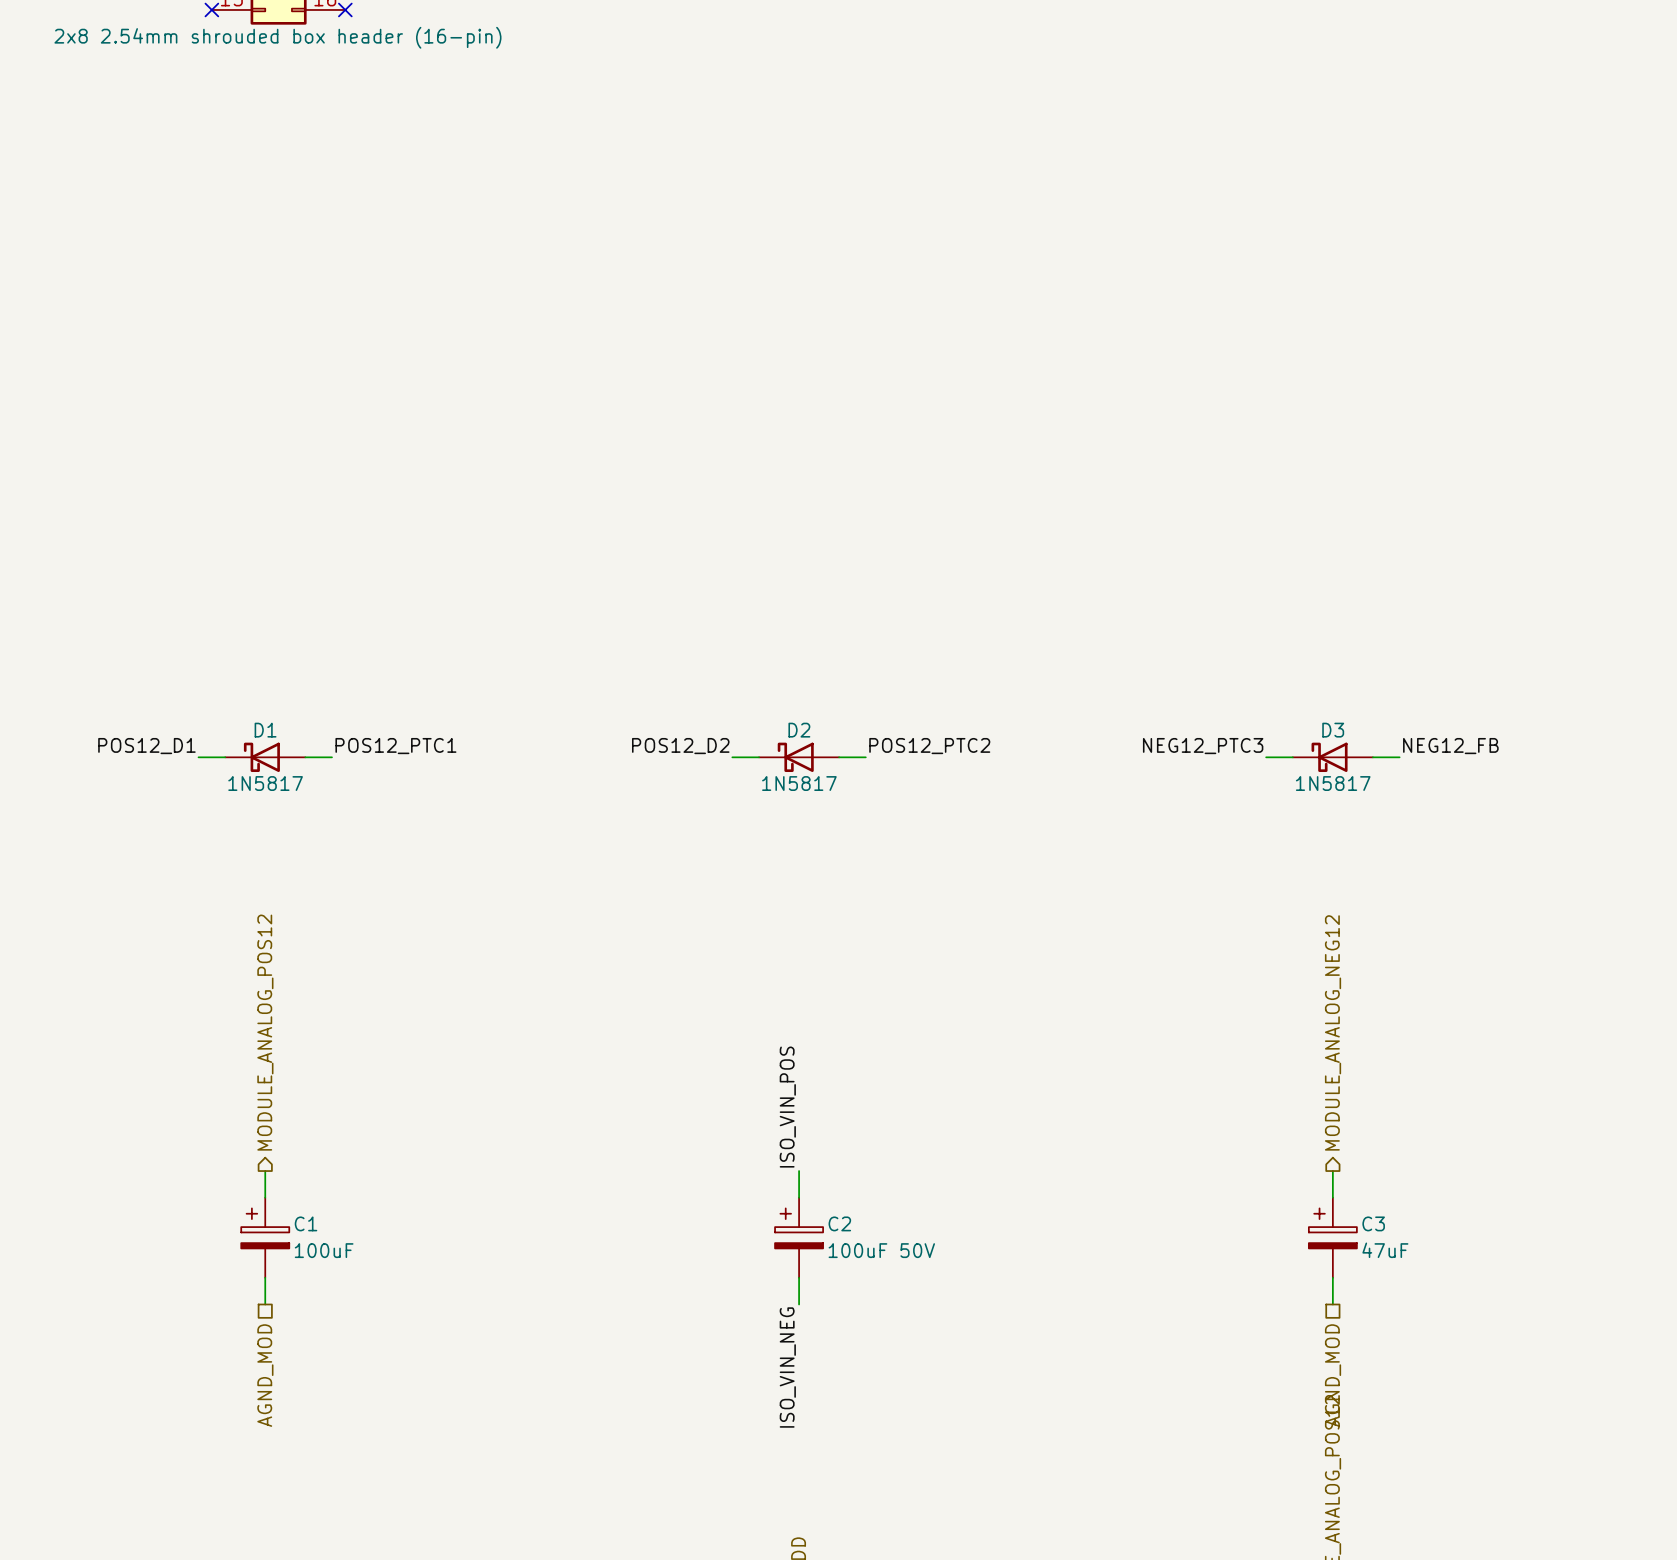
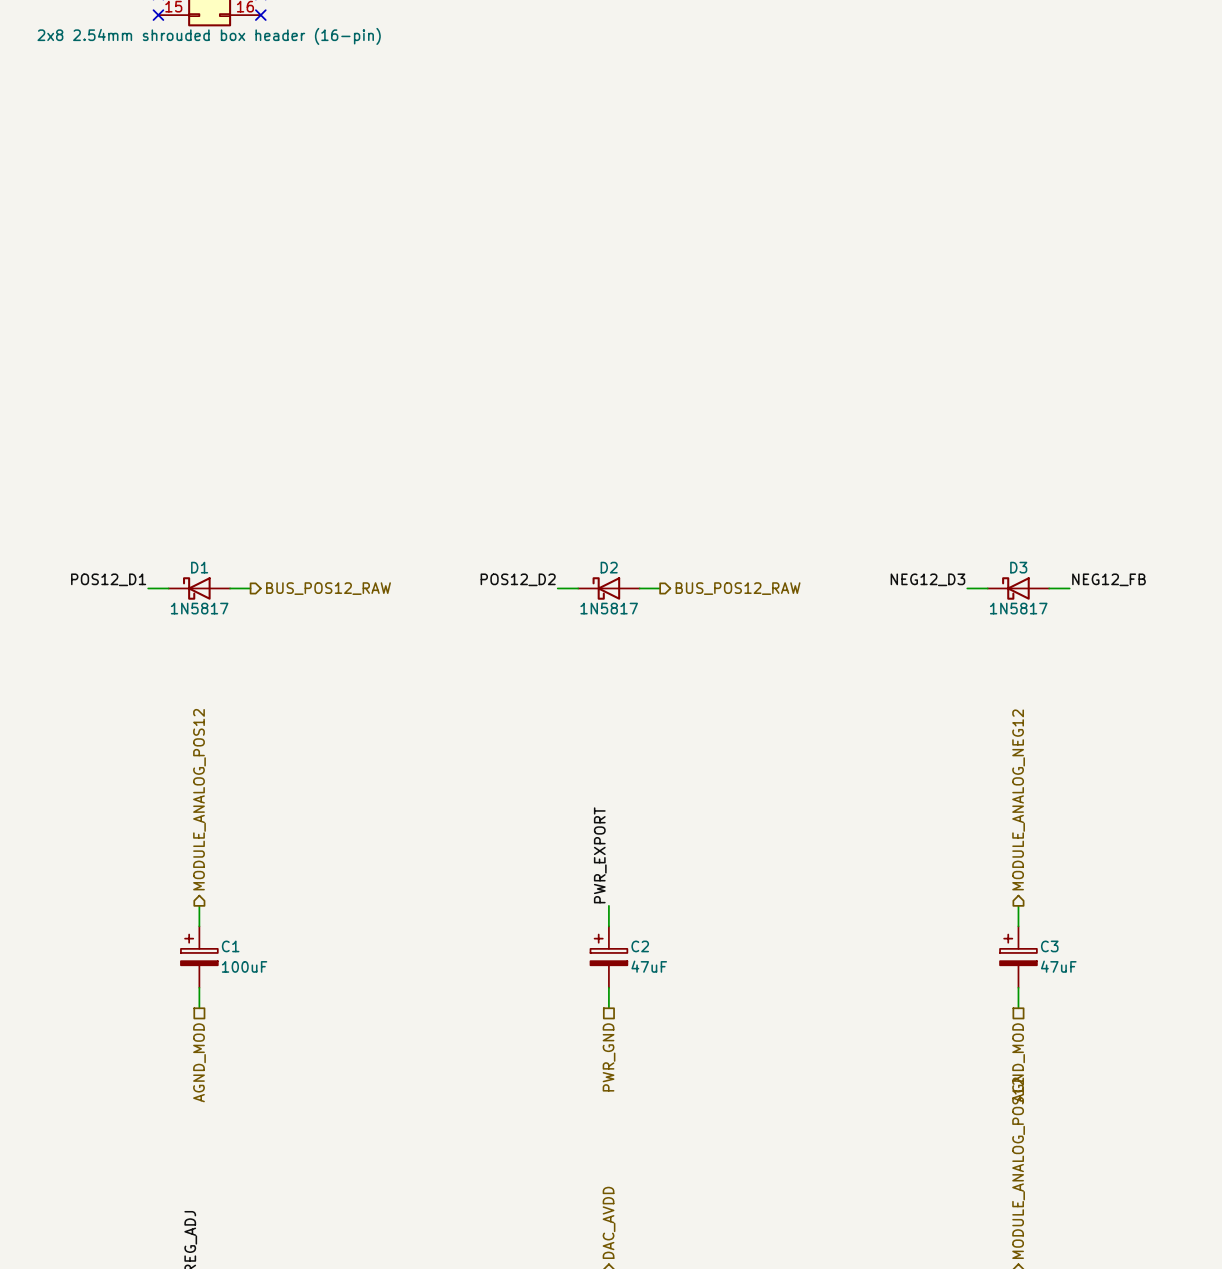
label: POS12_PTC1 (395, 746) -> none
label: POS12_PTC2 (929, 746) -> none
label: NEG12_PTC3 (1203, 746) -> NEG12_D3 (927, 579)
hierarchical label: none -> BUS_POS12_RAW (328, 588)
hierarchical label: none -> BUS_POS12_RAW (738, 588)
label: ISO_VIN_POS (787, 1107) -> PWR_EXPORT (600, 855)
C2 value: 100uF 50V (881, 1250) -> 47uF (649, 966)
label: ISO_VIN_NEG (787, 1367) -> none
hierarchical label: none -> PWR_GND (609, 1057)

